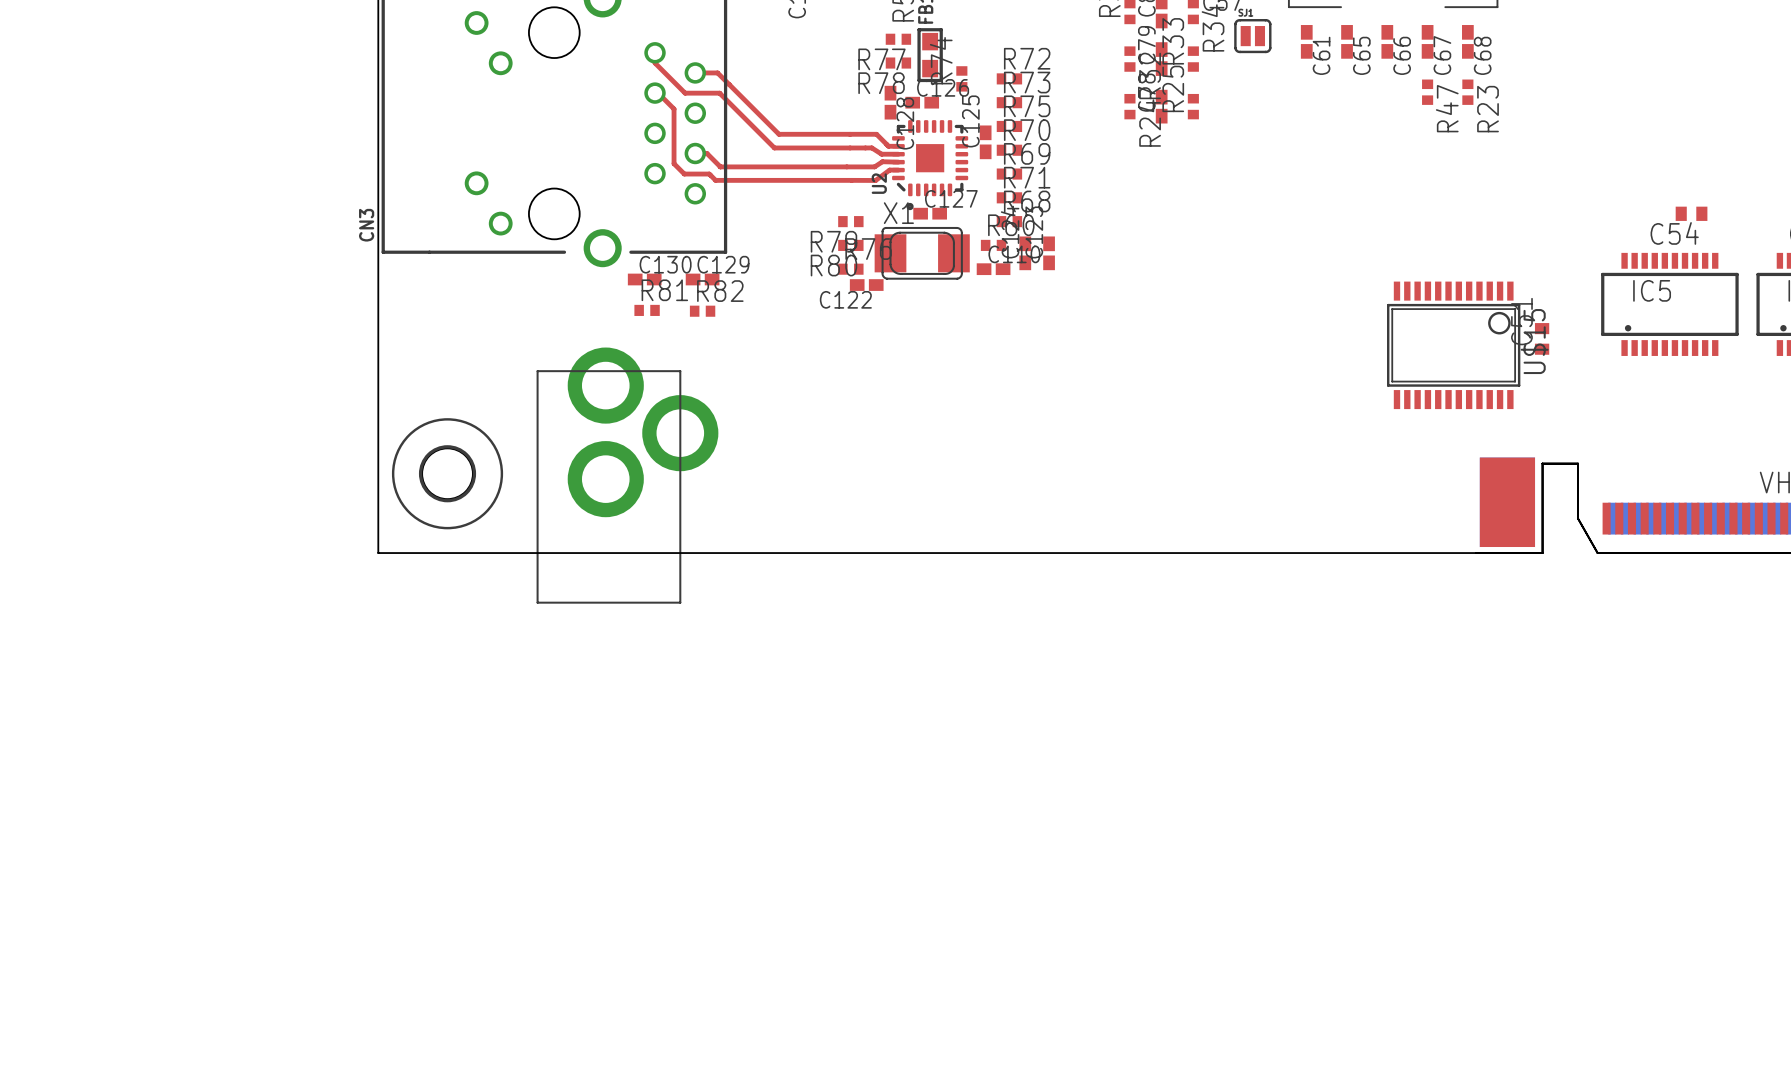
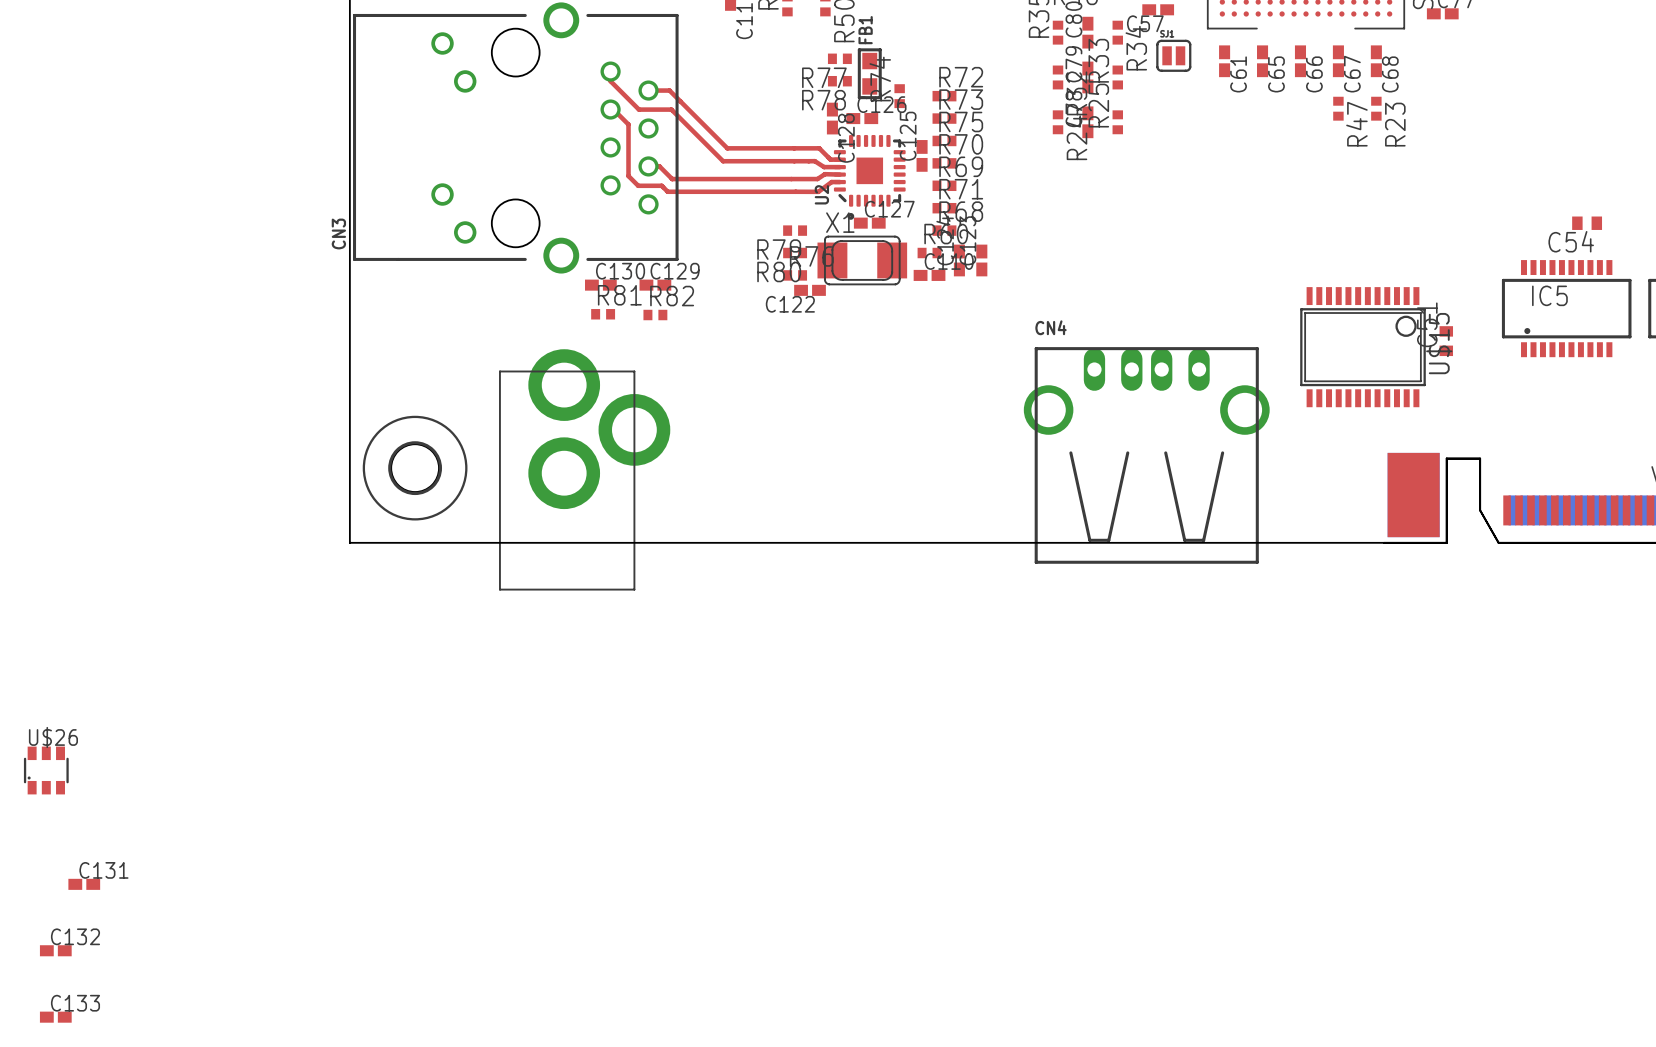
CN4: none -> (1146, 455)
U$26: none -> (46, 770)
C131: none -> (84, 884)
C132: none -> (55, 950)
C133: none -> (55, 1017)

